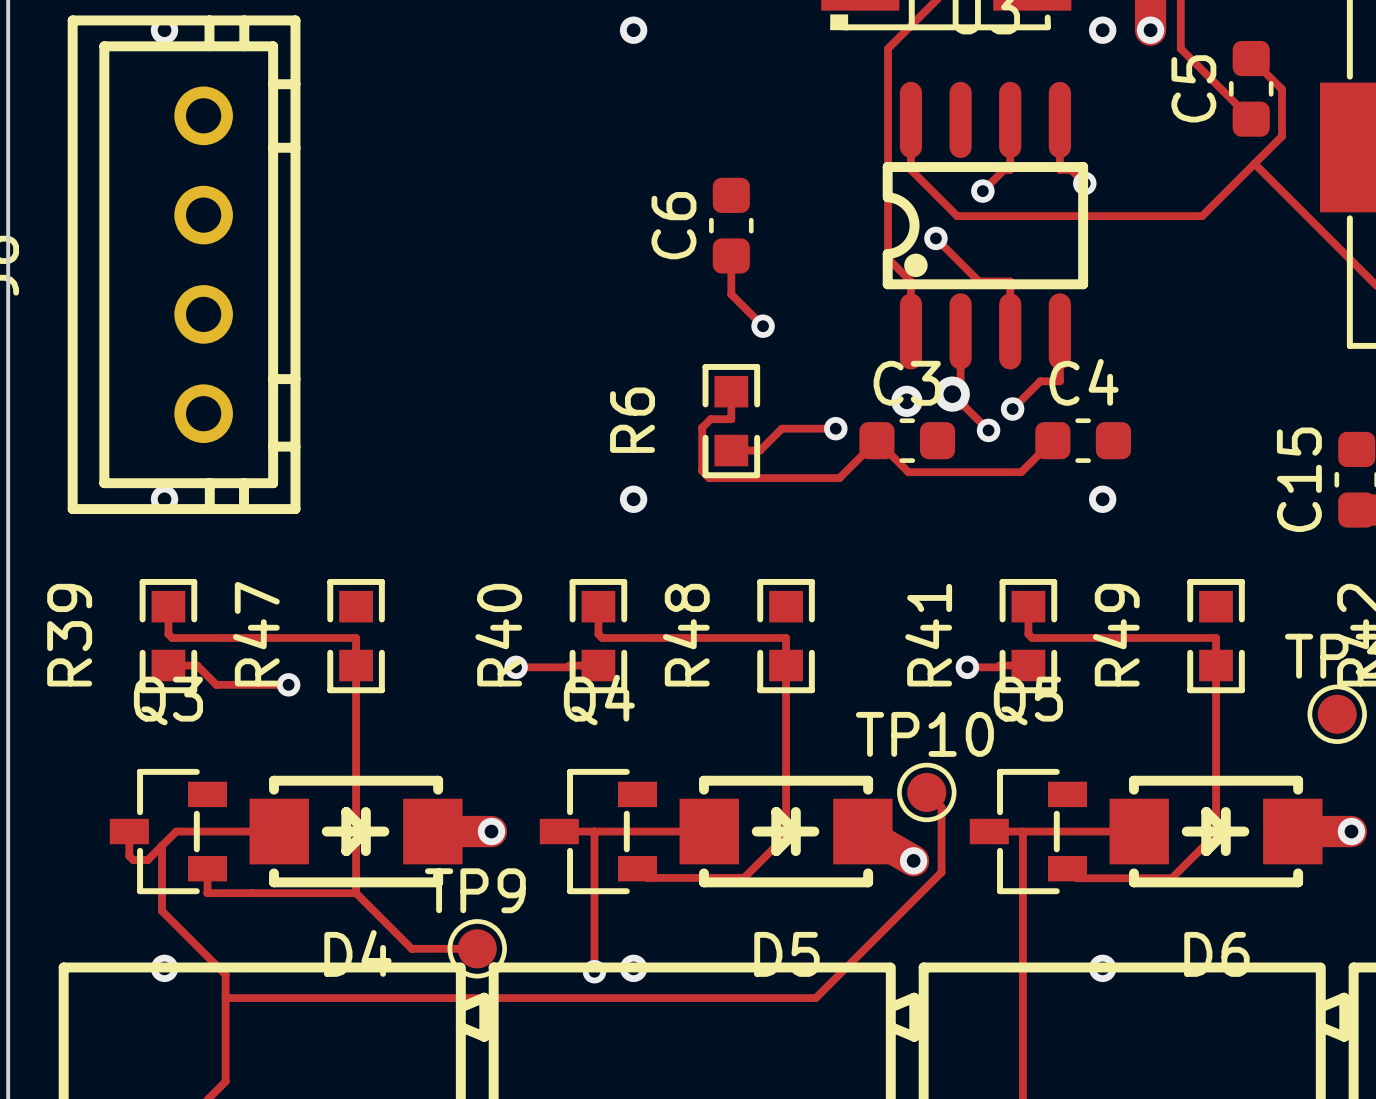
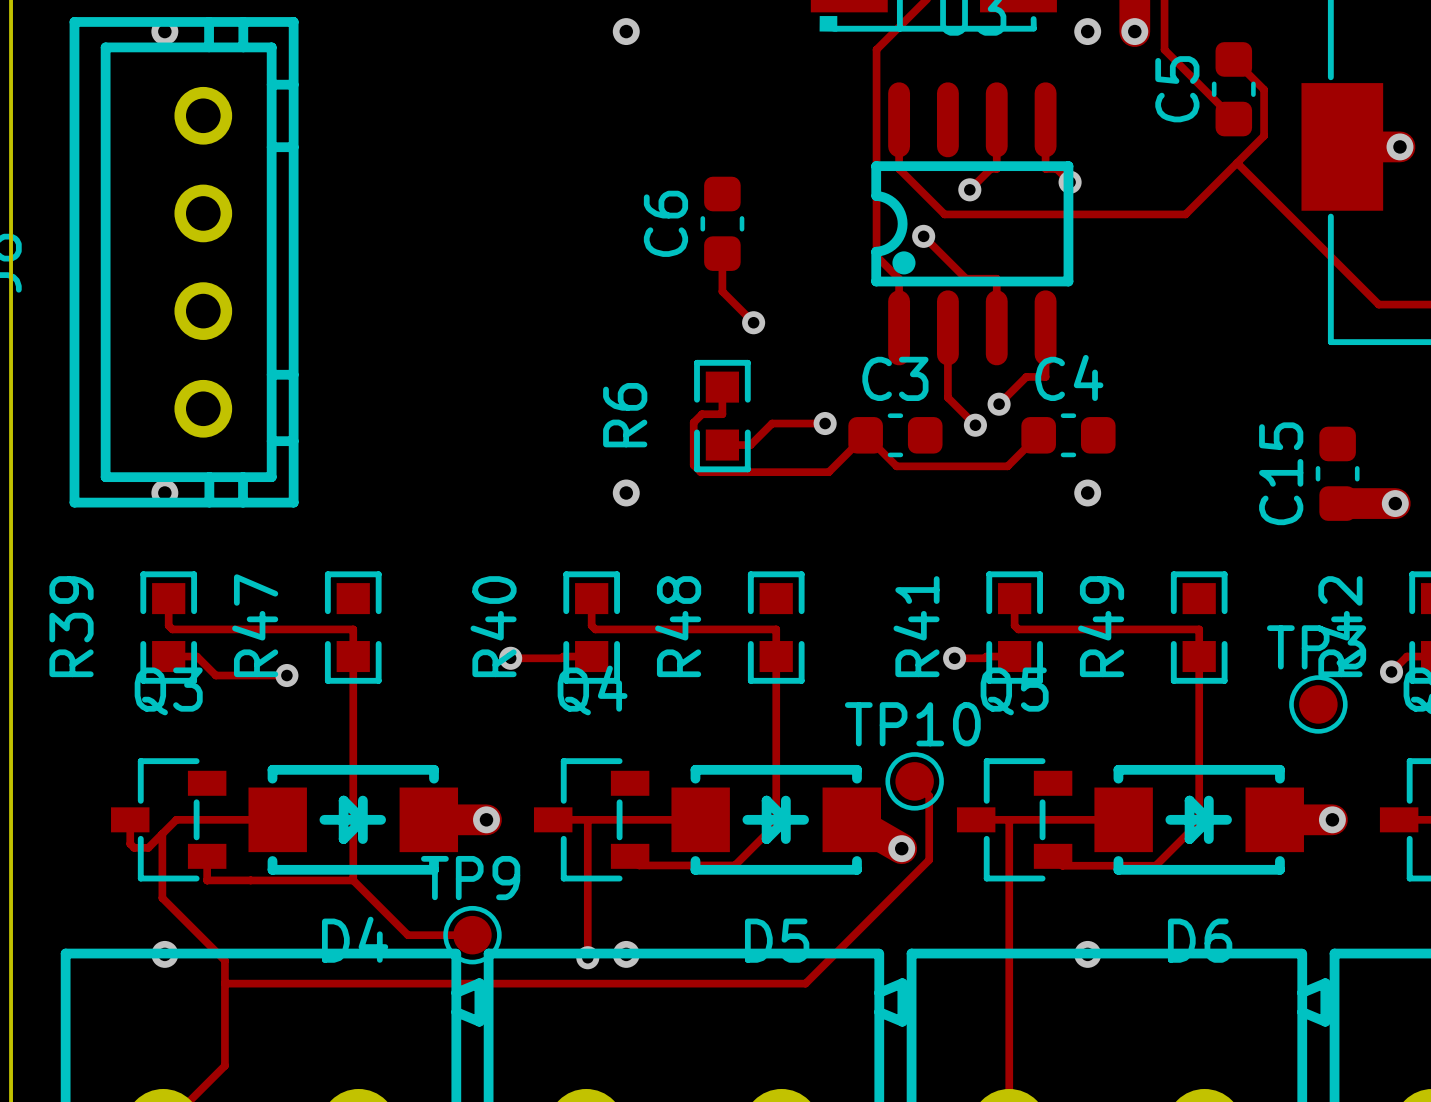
via: (952, 394) -> none
via: (906, 401) -> none

